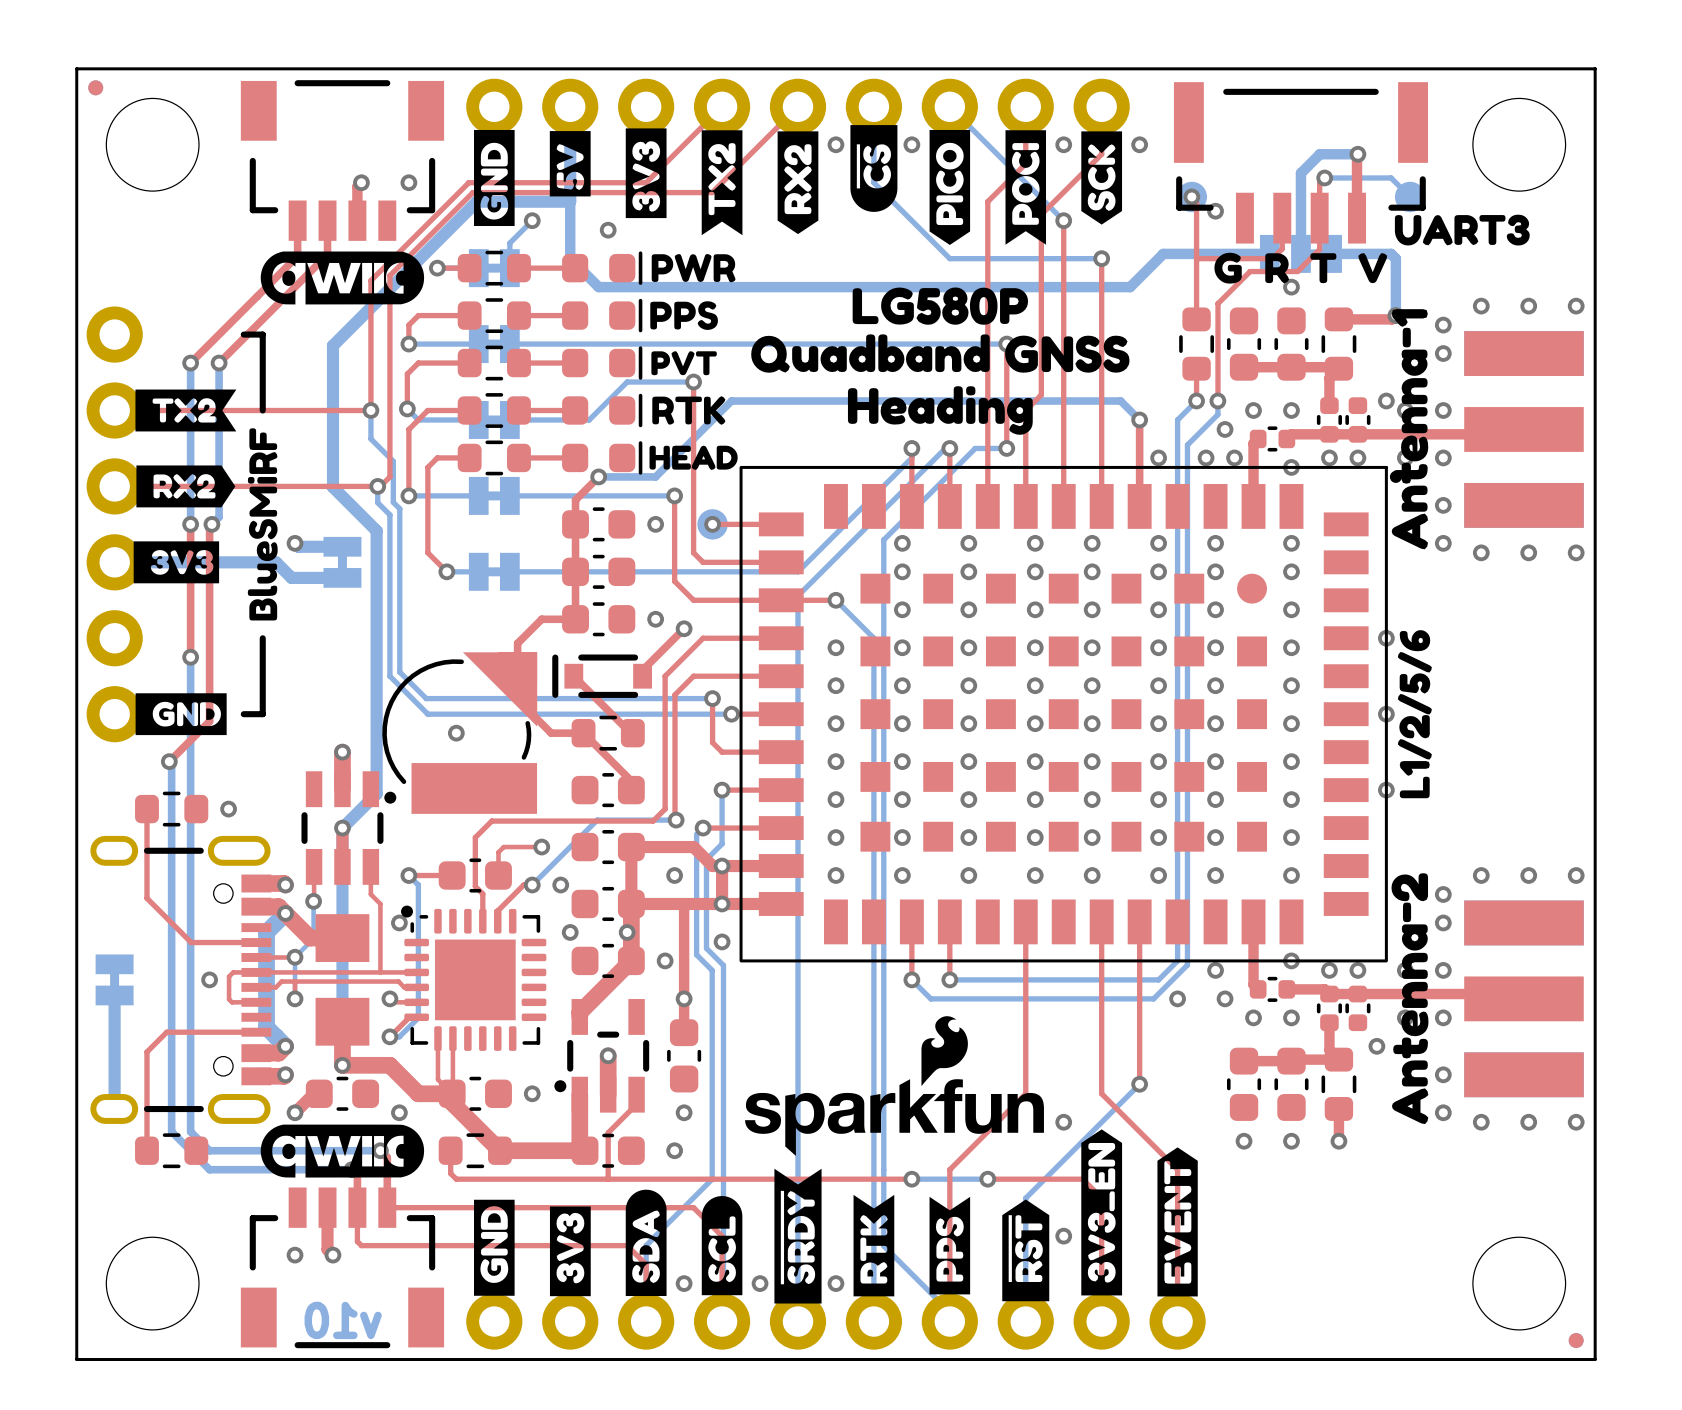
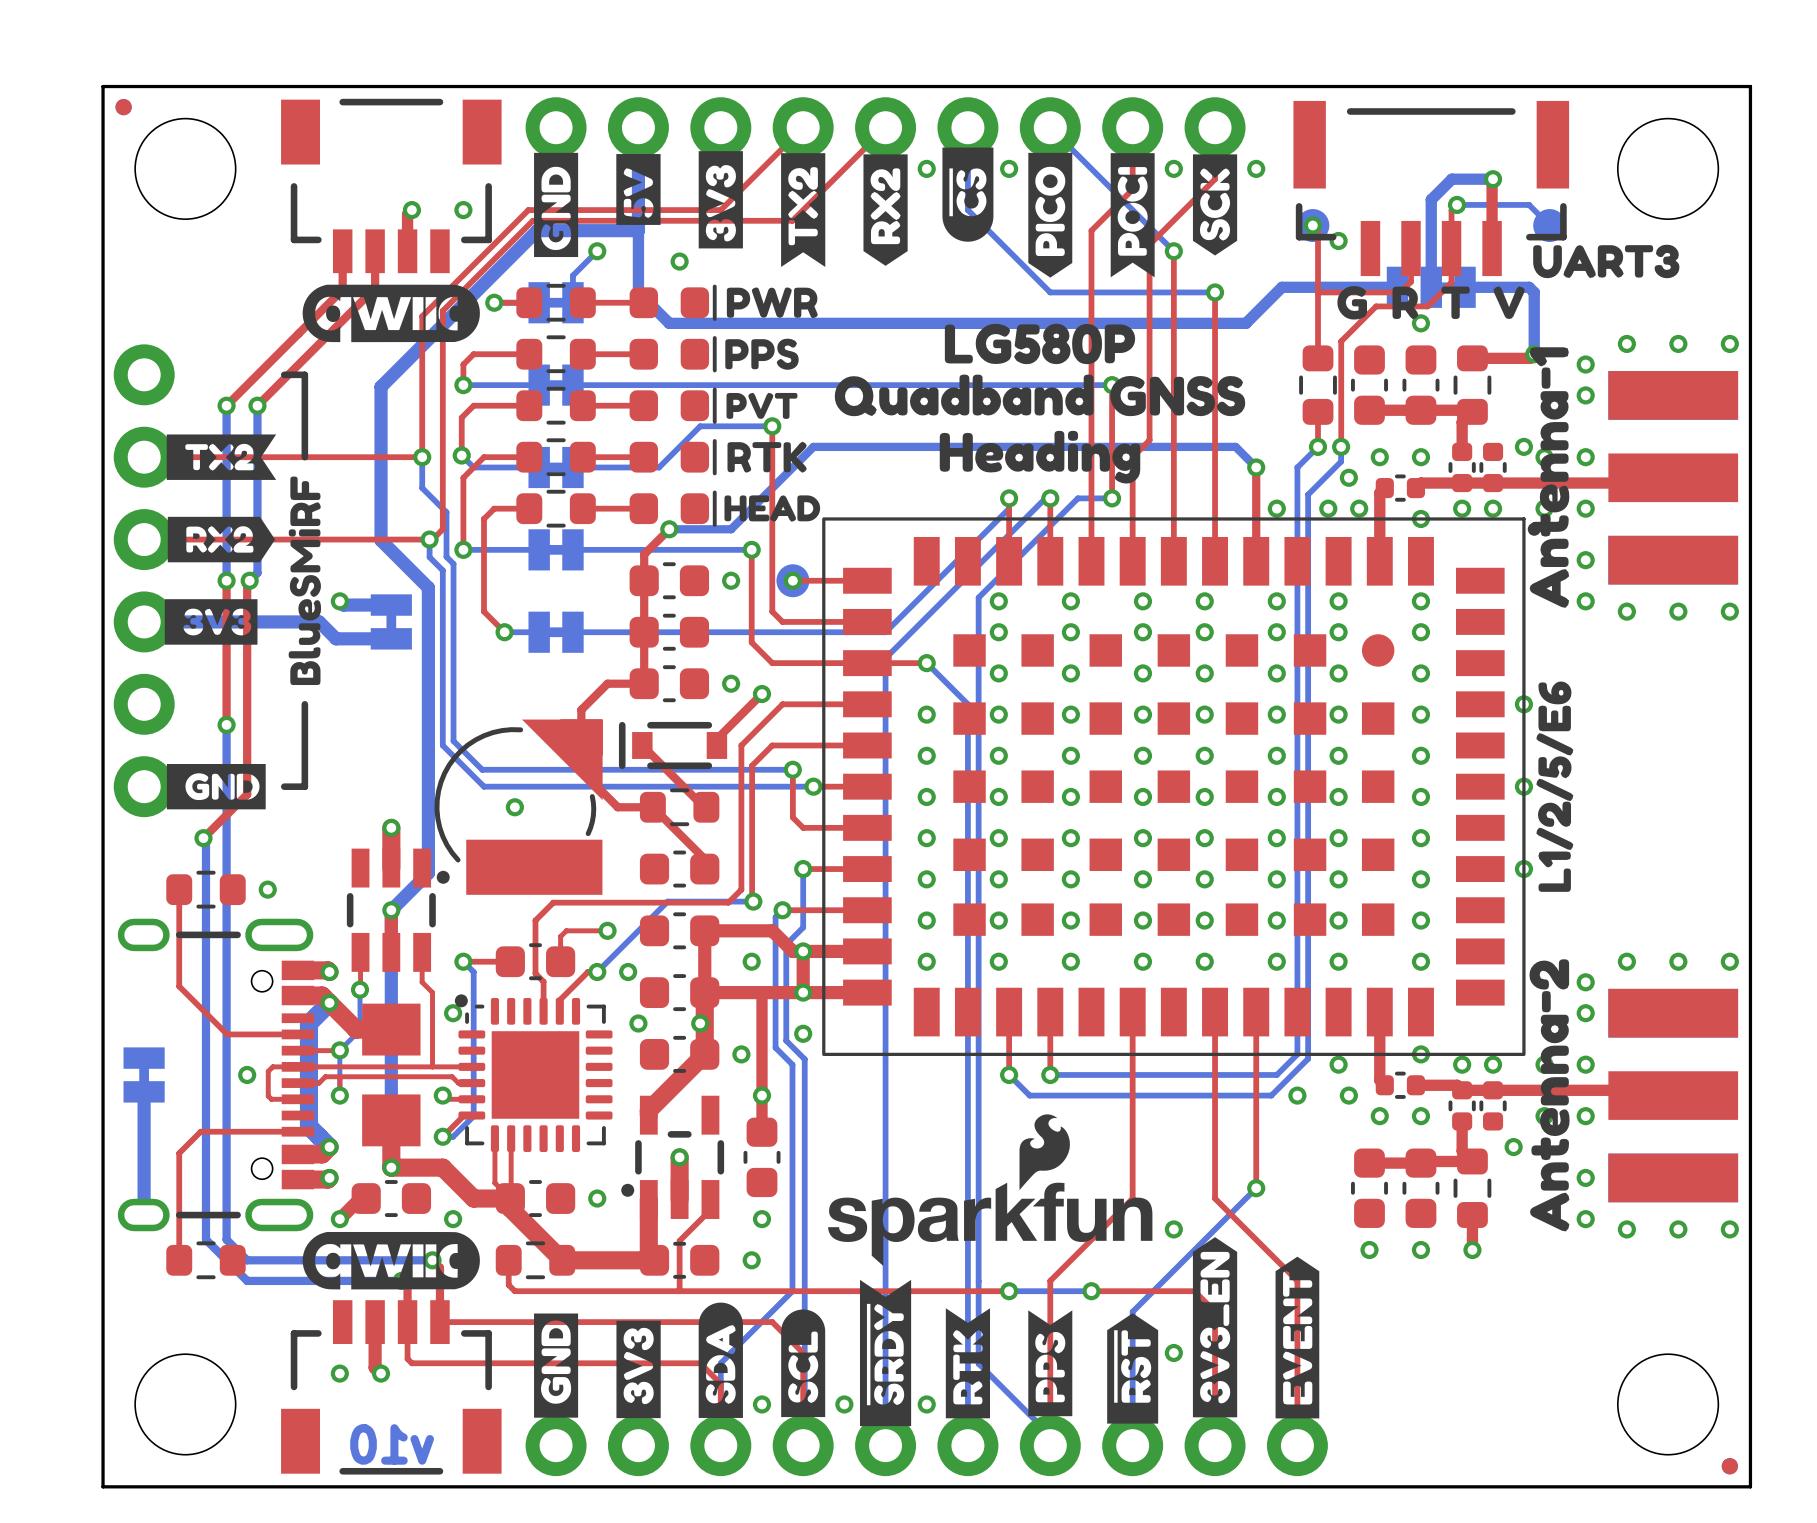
drawing shape: [1397, 630, 1432, 799] -> [1536, 681, 1574, 892]

